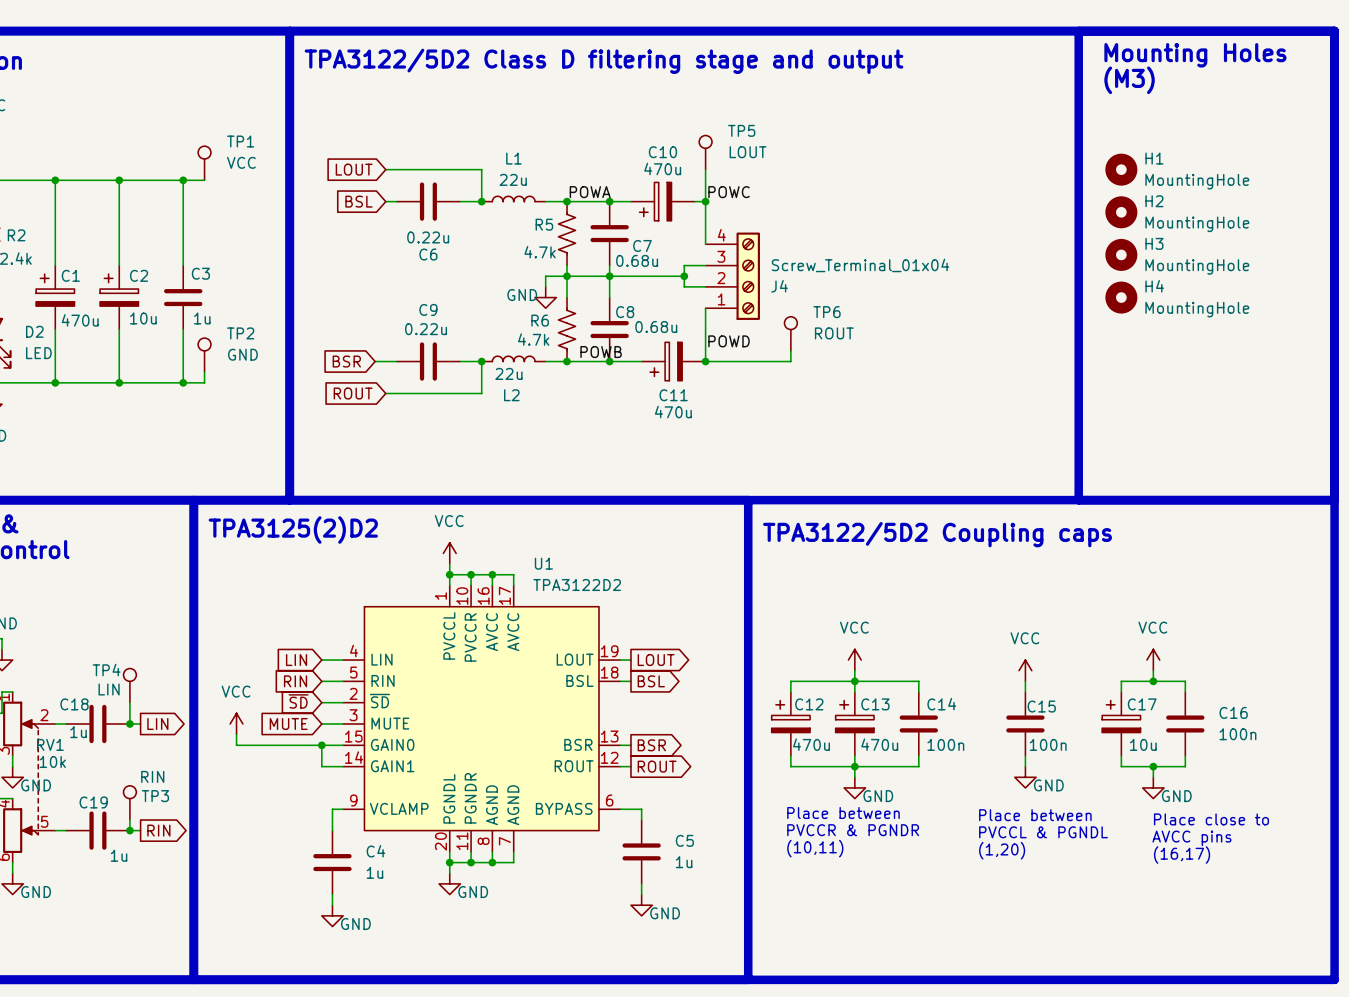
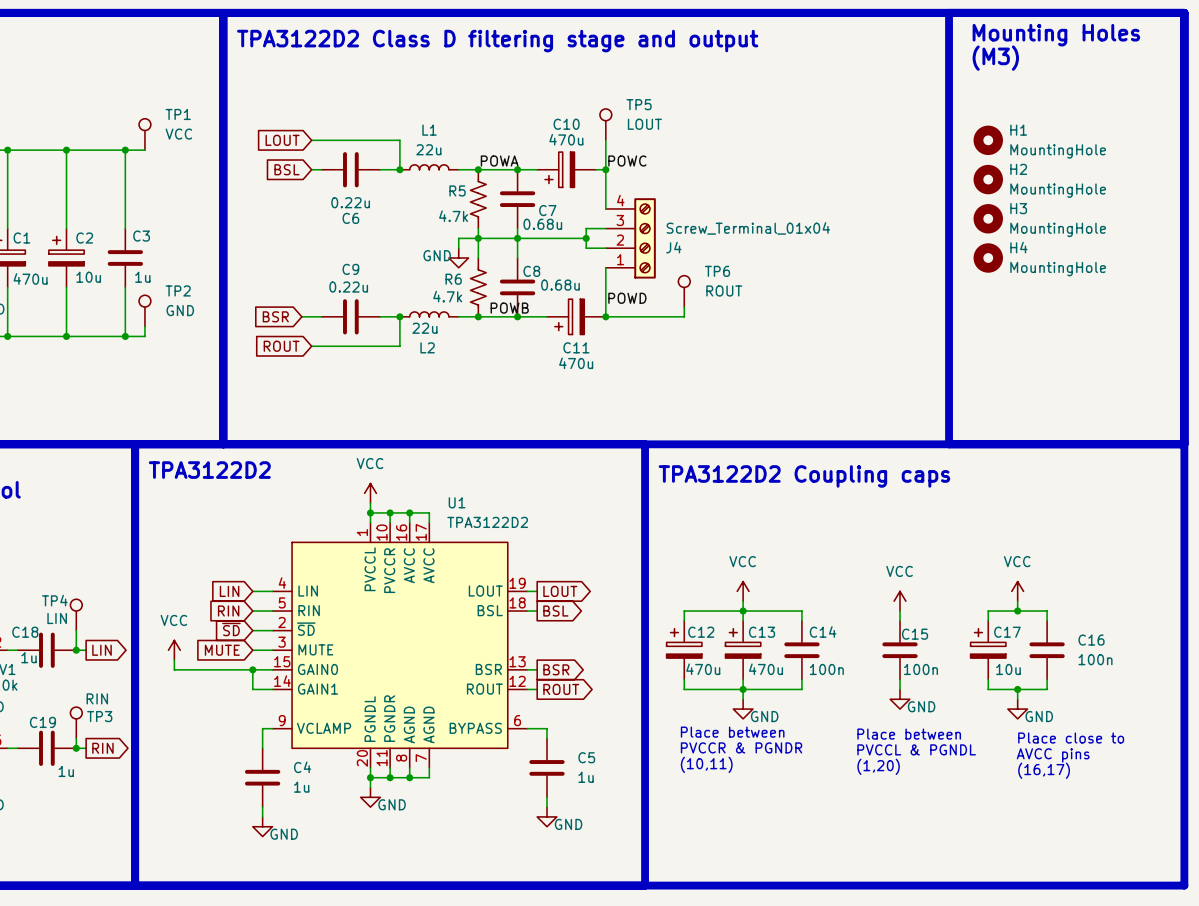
text: TPA3122/5D2 Class D filtering stage and output (603, 61) -> TPA3122D2 Class D filtering stage and output (497, 41)
text: TPA3125(2)D2 (293, 530) -> TPA3122D2 (209, 470)
text: TPA3122/5D2 Coupling caps (937, 534) -> TPA3122D2 Coupling caps (804, 476)

